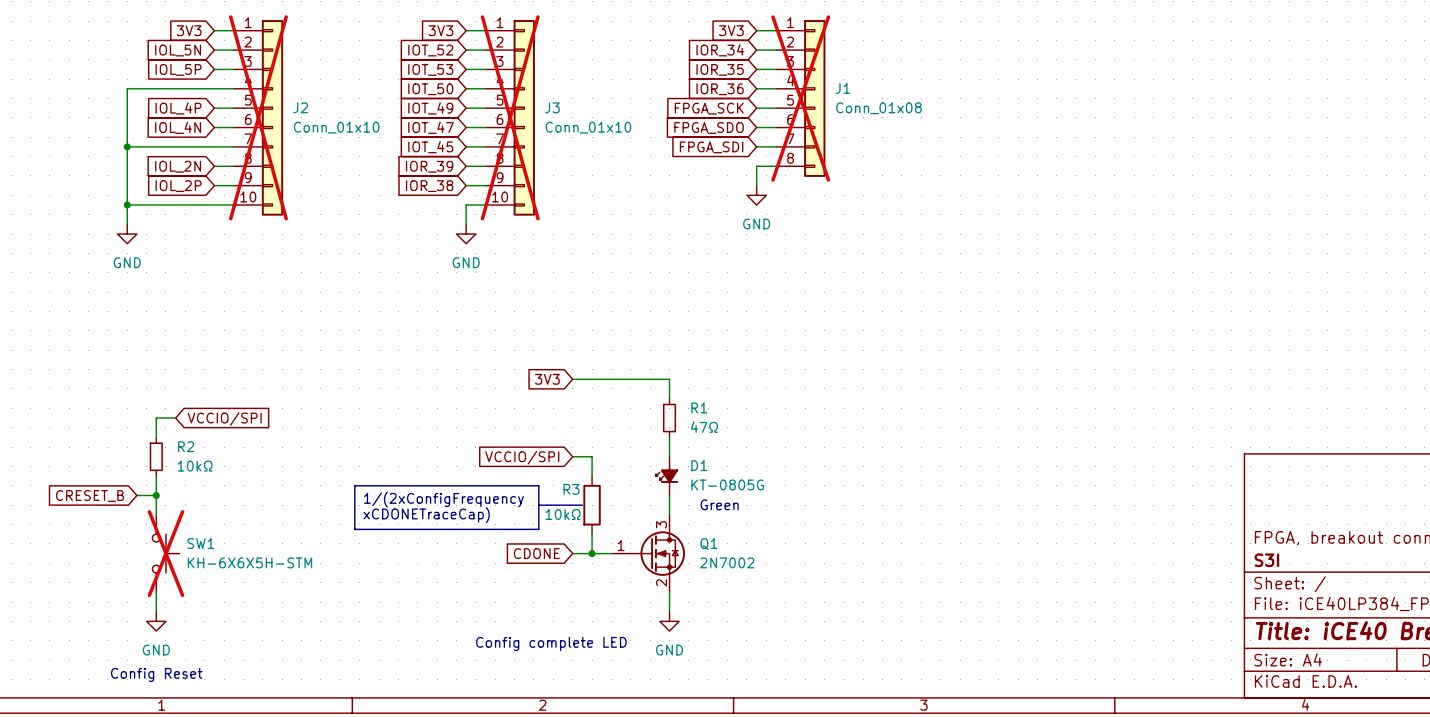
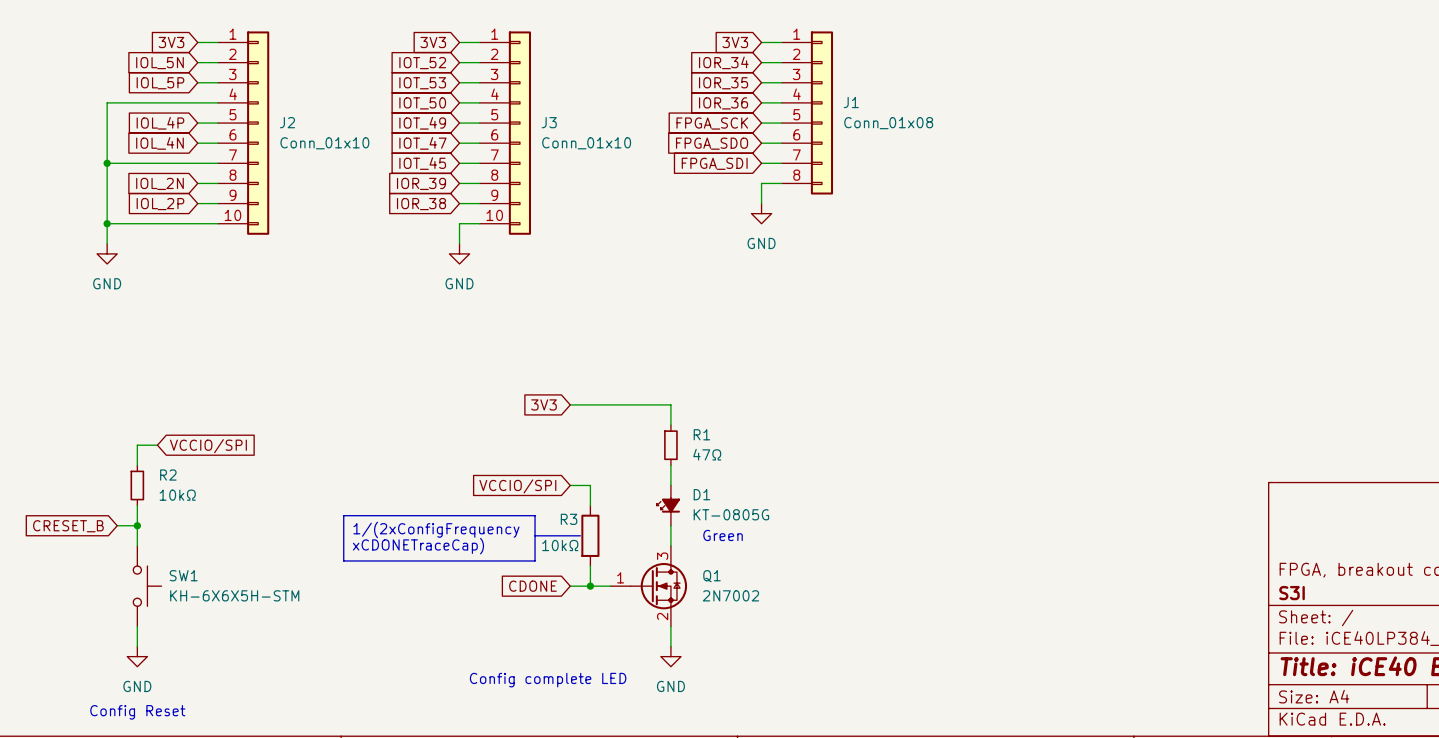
J1 do-not-place cross: (800, 98) -> none
J2 do-not-place cross: (258, 117) -> none
J3 do-not-place cross: (510, 117) -> none
SW1 do-not-place cross: (165, 553) -> none

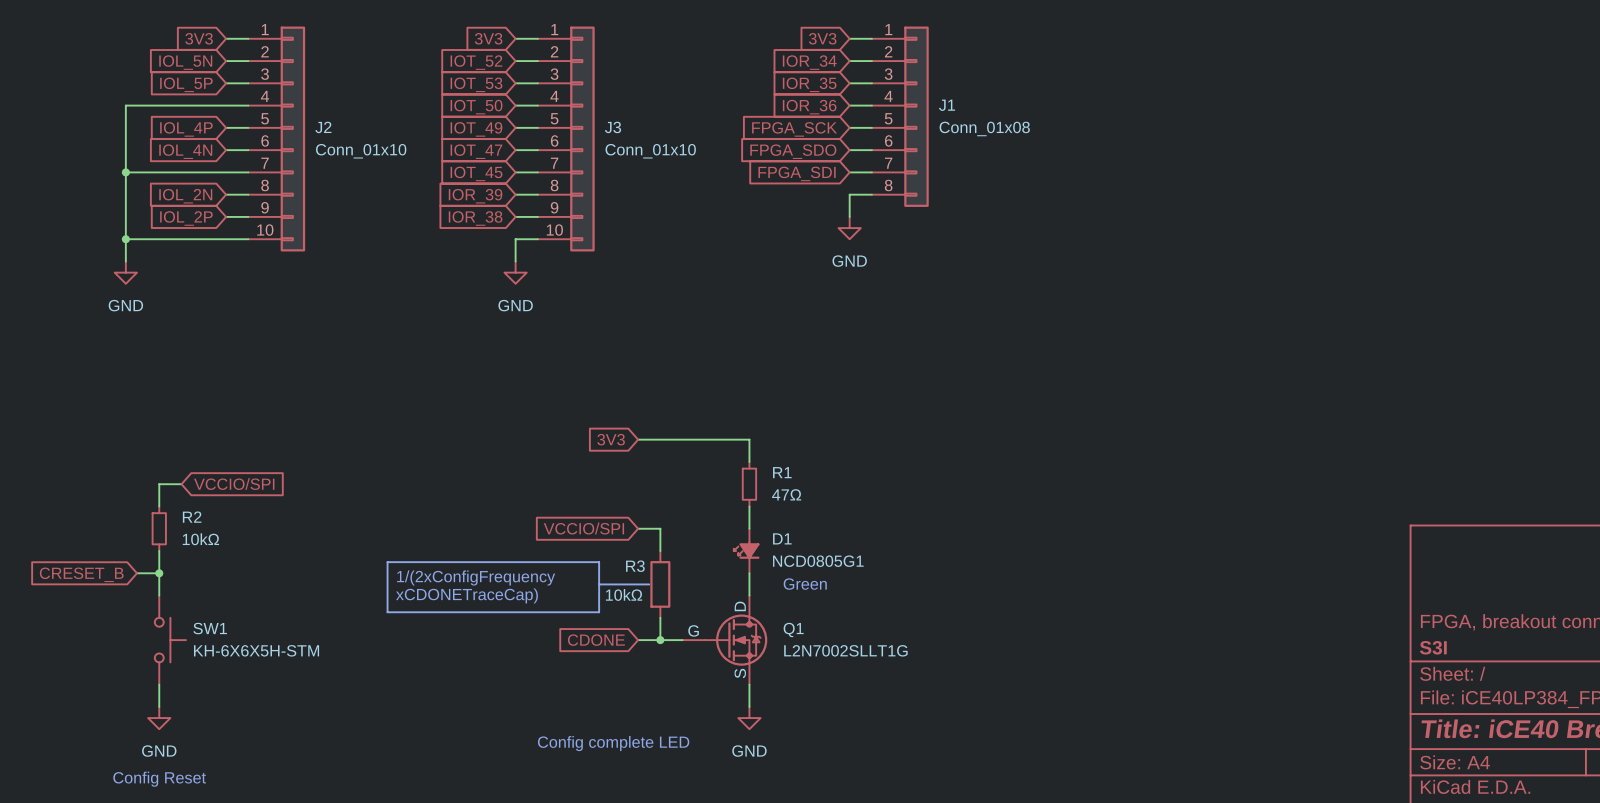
D1 value: KT-0805G (731, 514) -> NCD0805G1 (818, 561)
Q1 symbol: [610, 545, 688, 627] -> [682, 595, 768, 685]
Q1 value: 2N7002 (730, 595) -> L2N7002SLLT1G (845, 650)

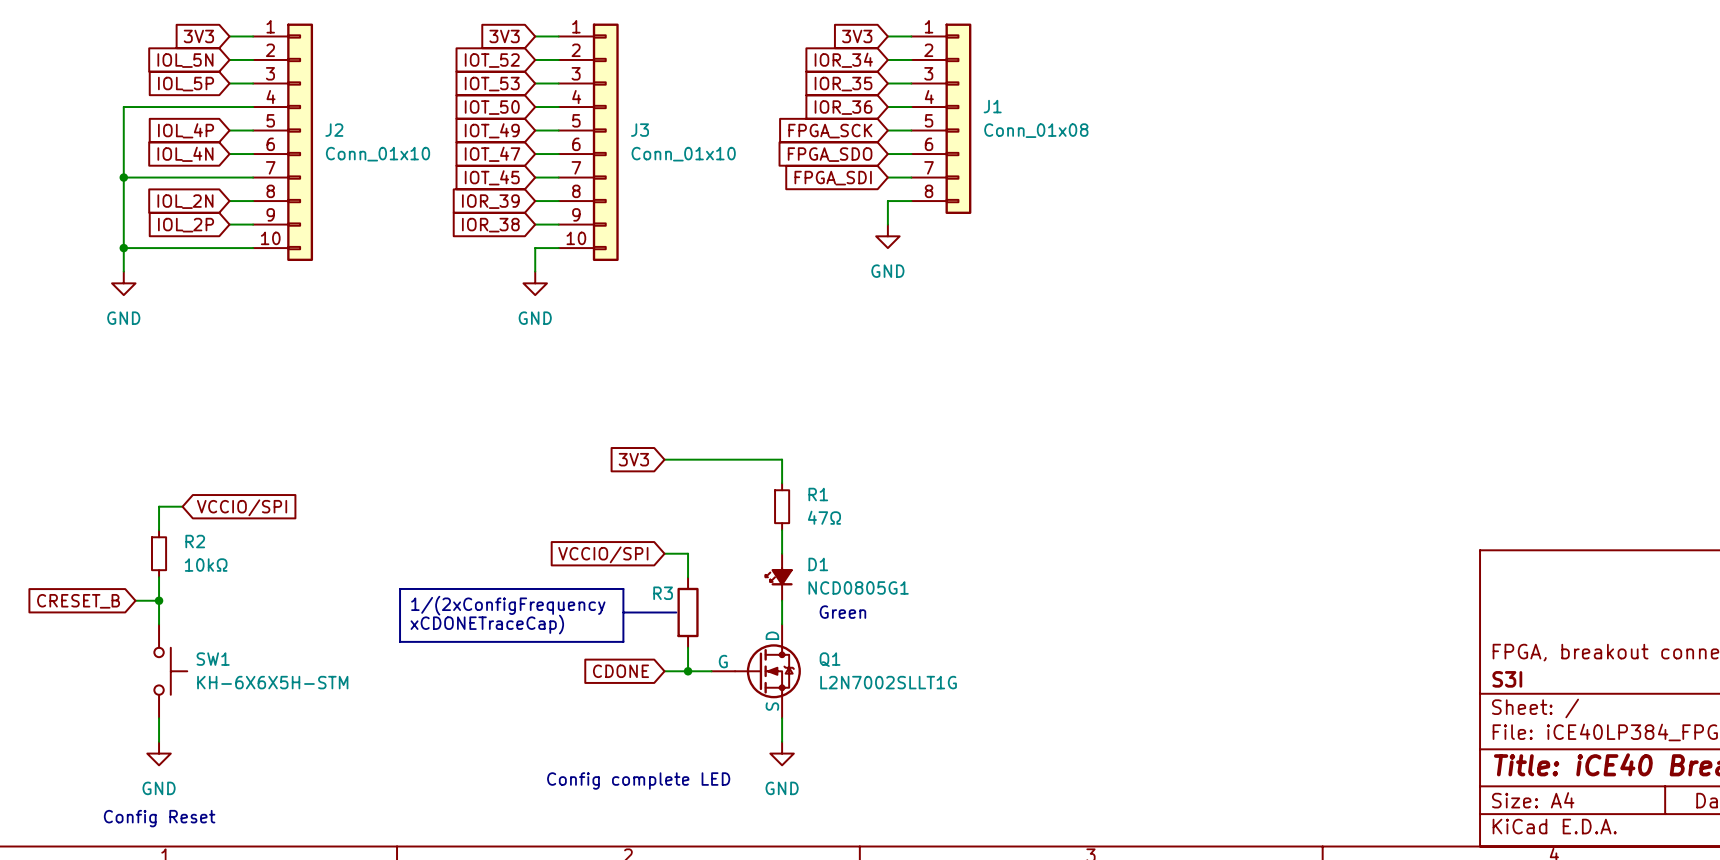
R3 value: 10kΩ (624, 594) -> none

